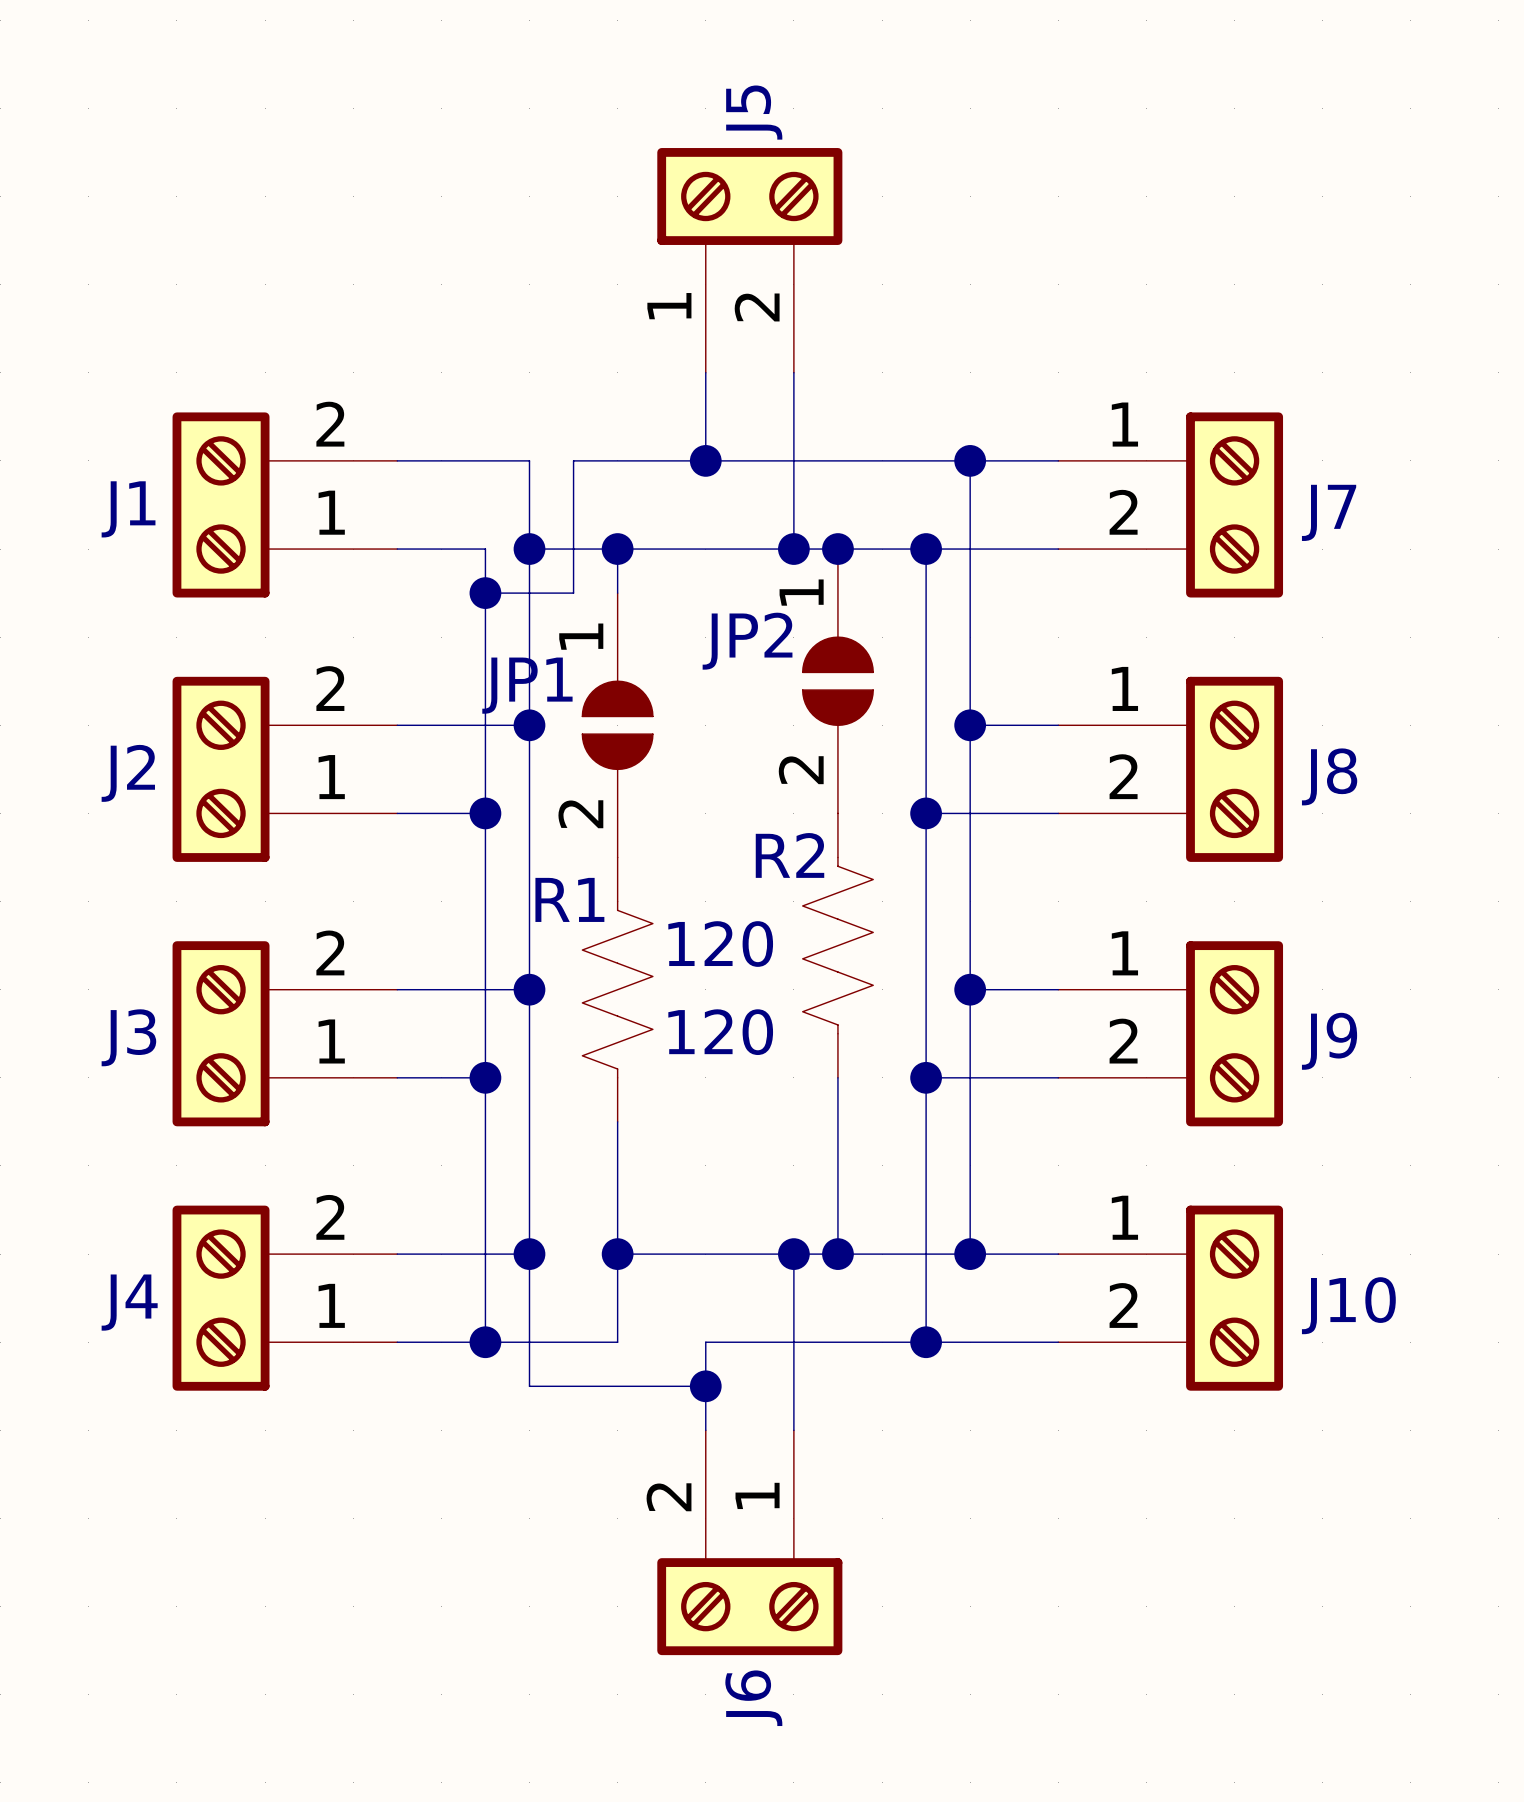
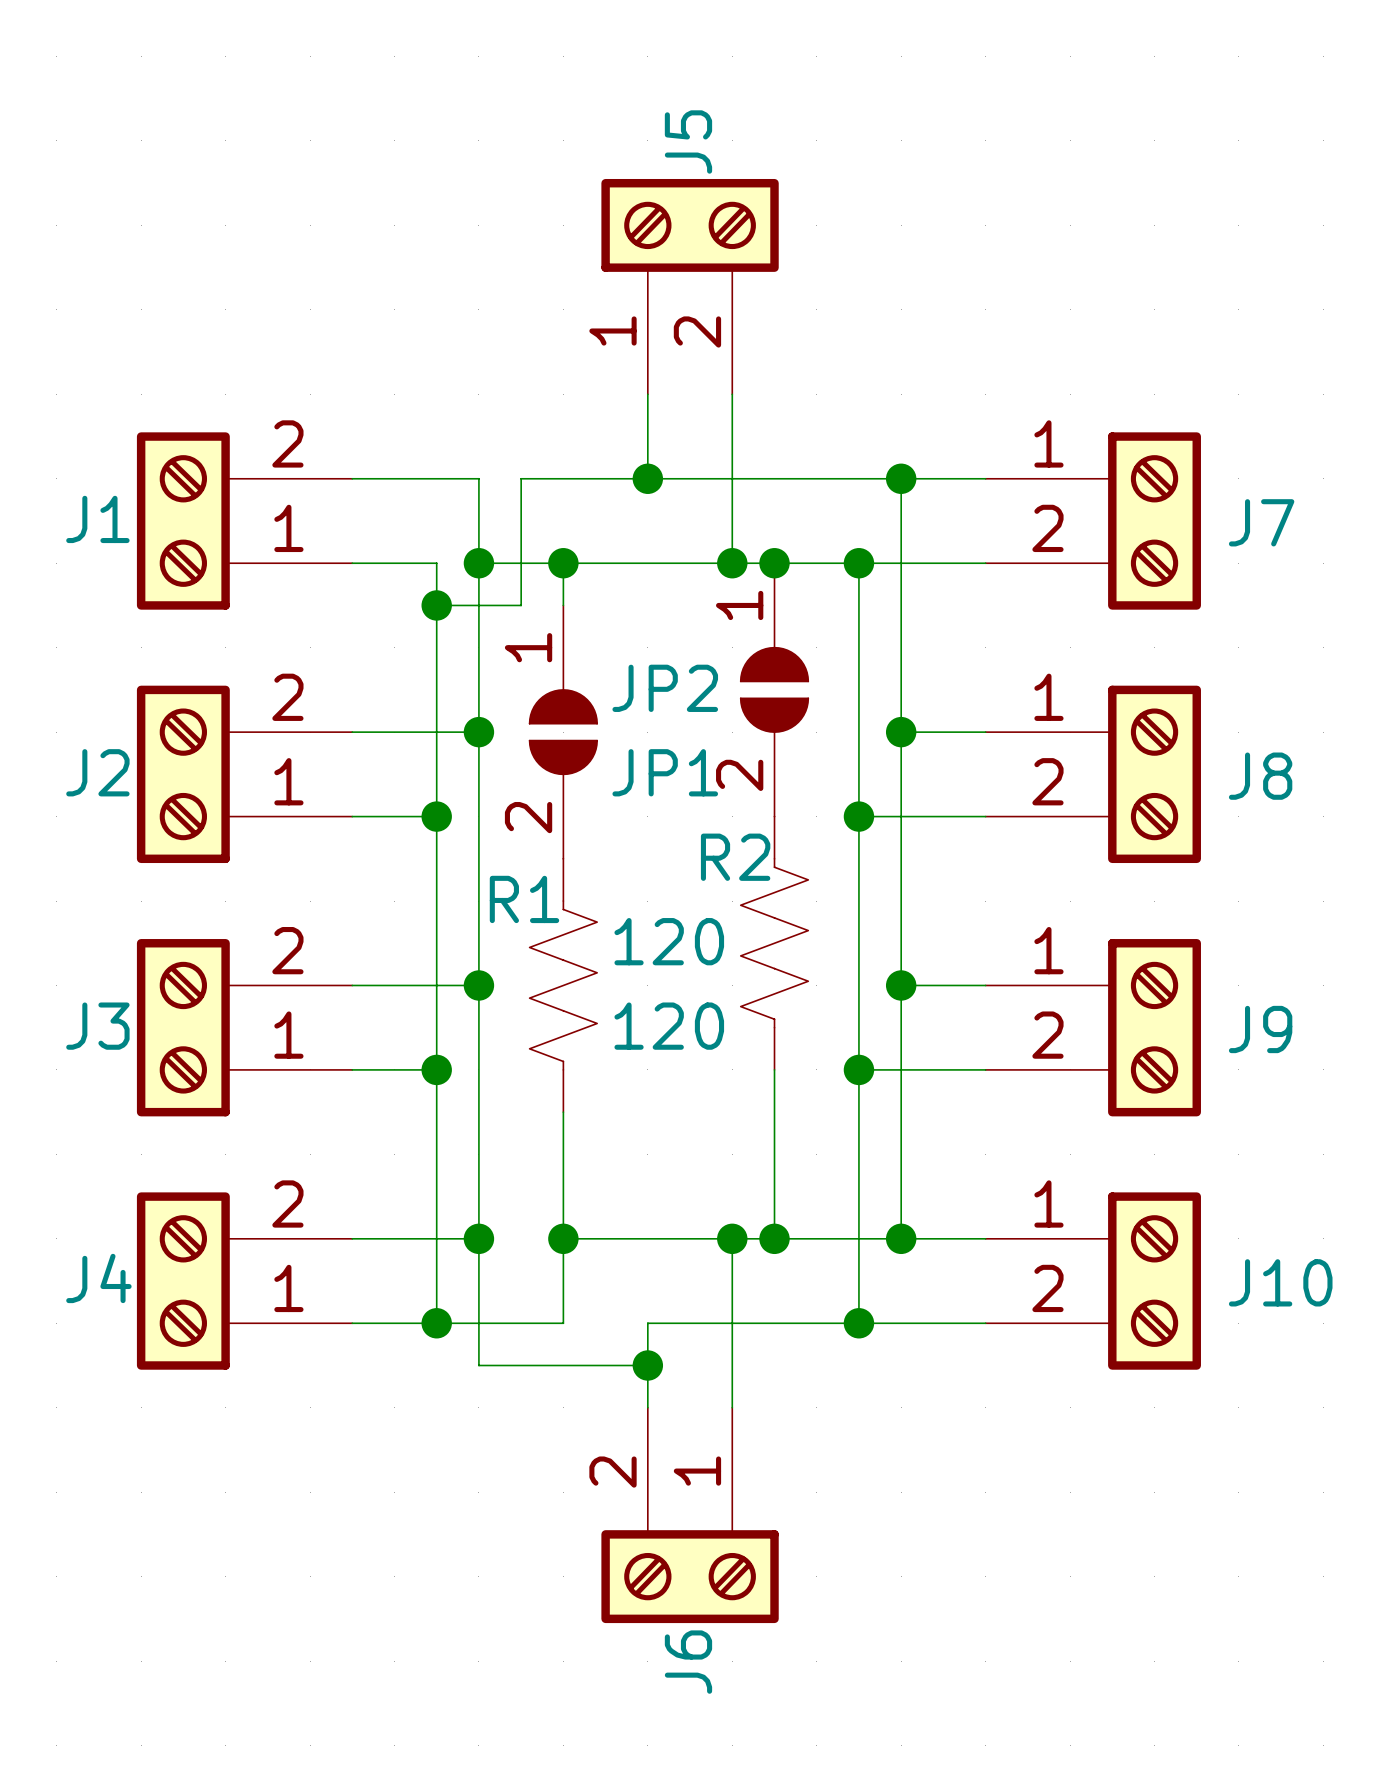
JP2 name position: JP2 (747, 641) -> JP2 (665, 688)
JP1 name position: JP1 (527, 685) -> JP1 (665, 772)

